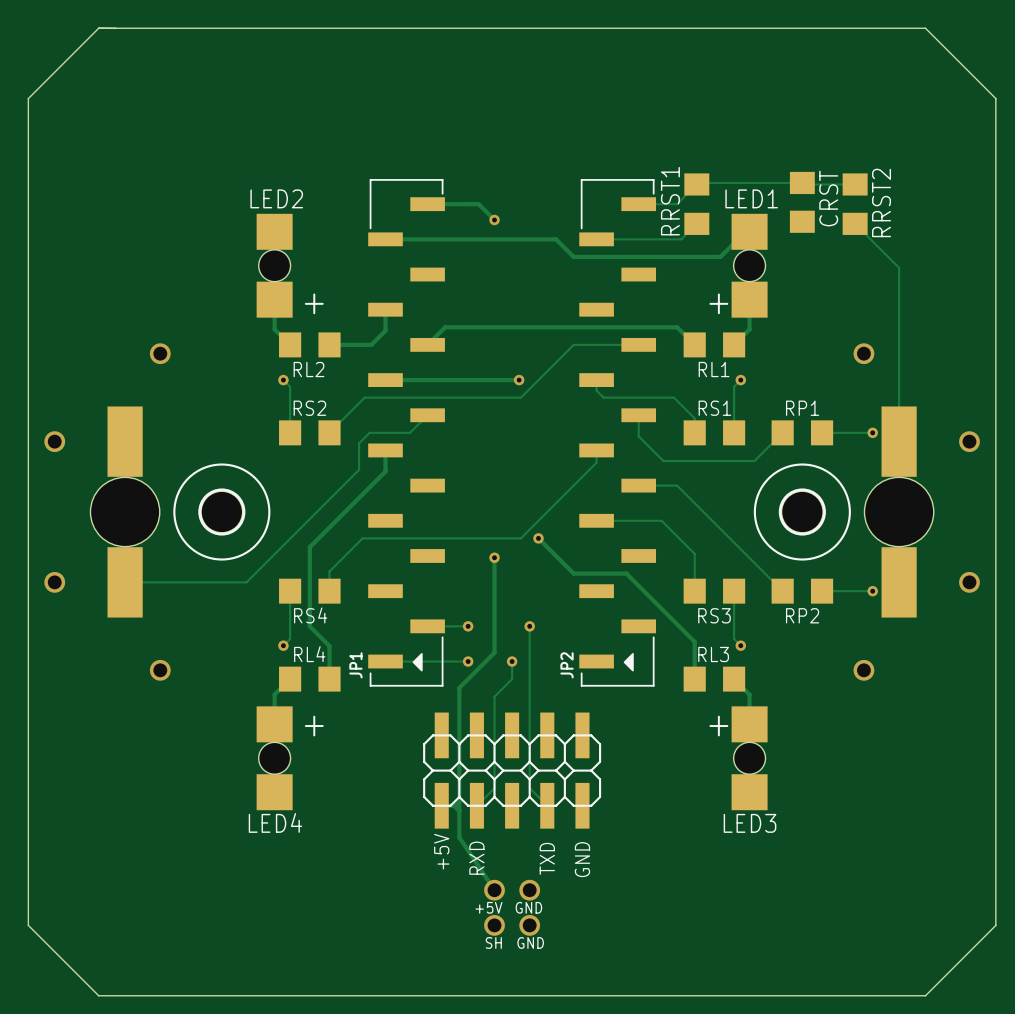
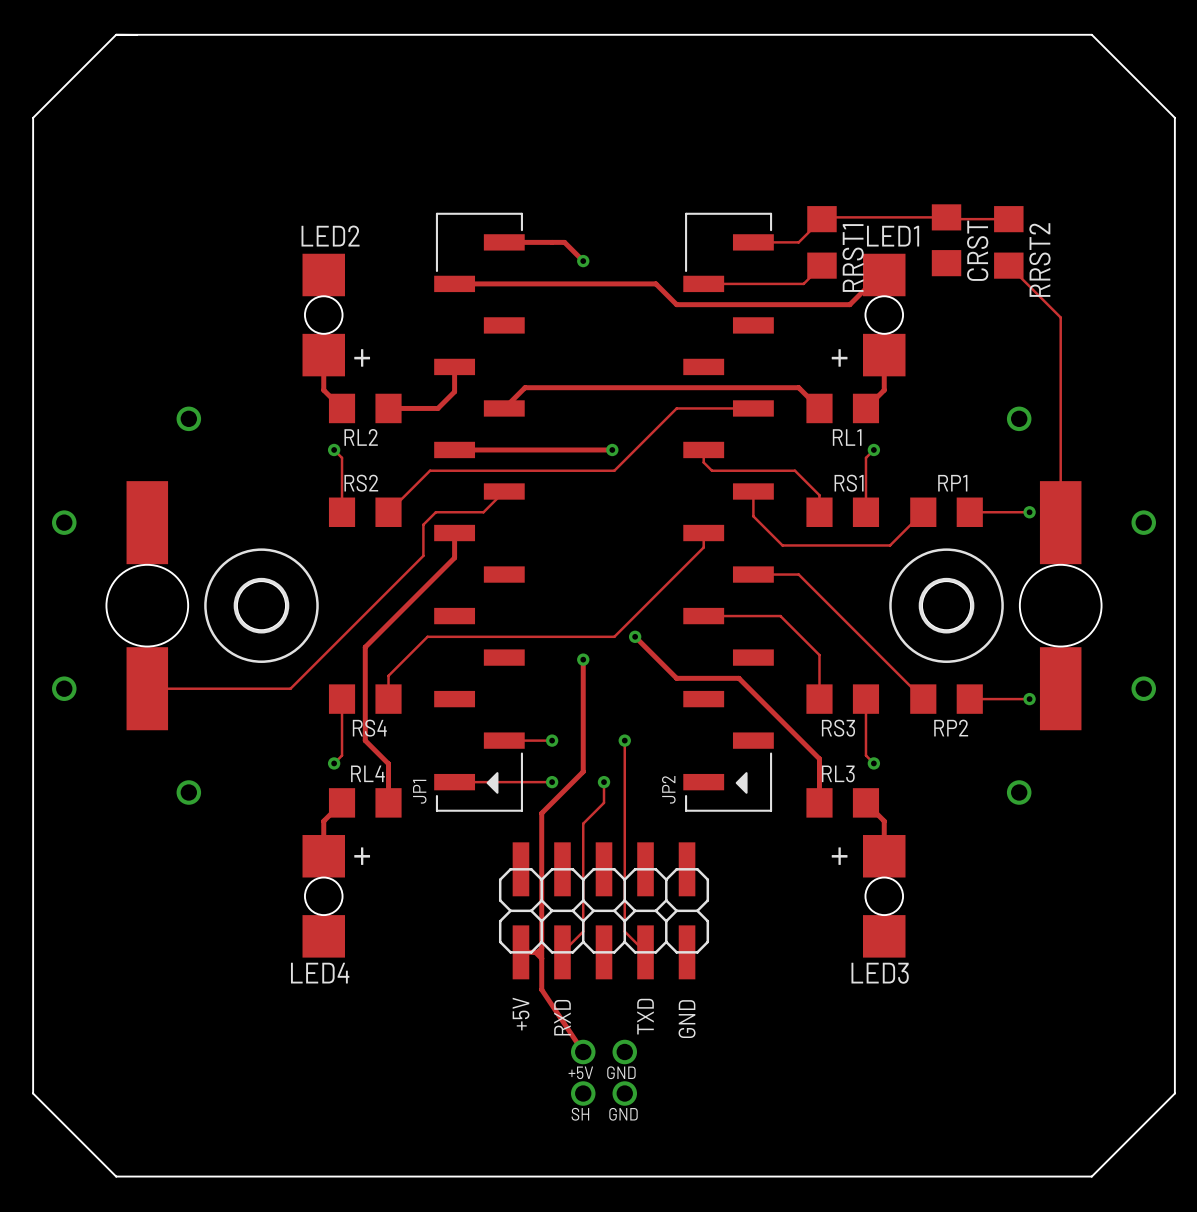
CRST name position: CRST (828, 198) -> CRST (977, 250)
RRST1 name position: RRST1 (670, 201) -> RRST1 (853, 258)
RRST2 name position: RRST2 (881, 202) -> RRST2 (1039, 260)

